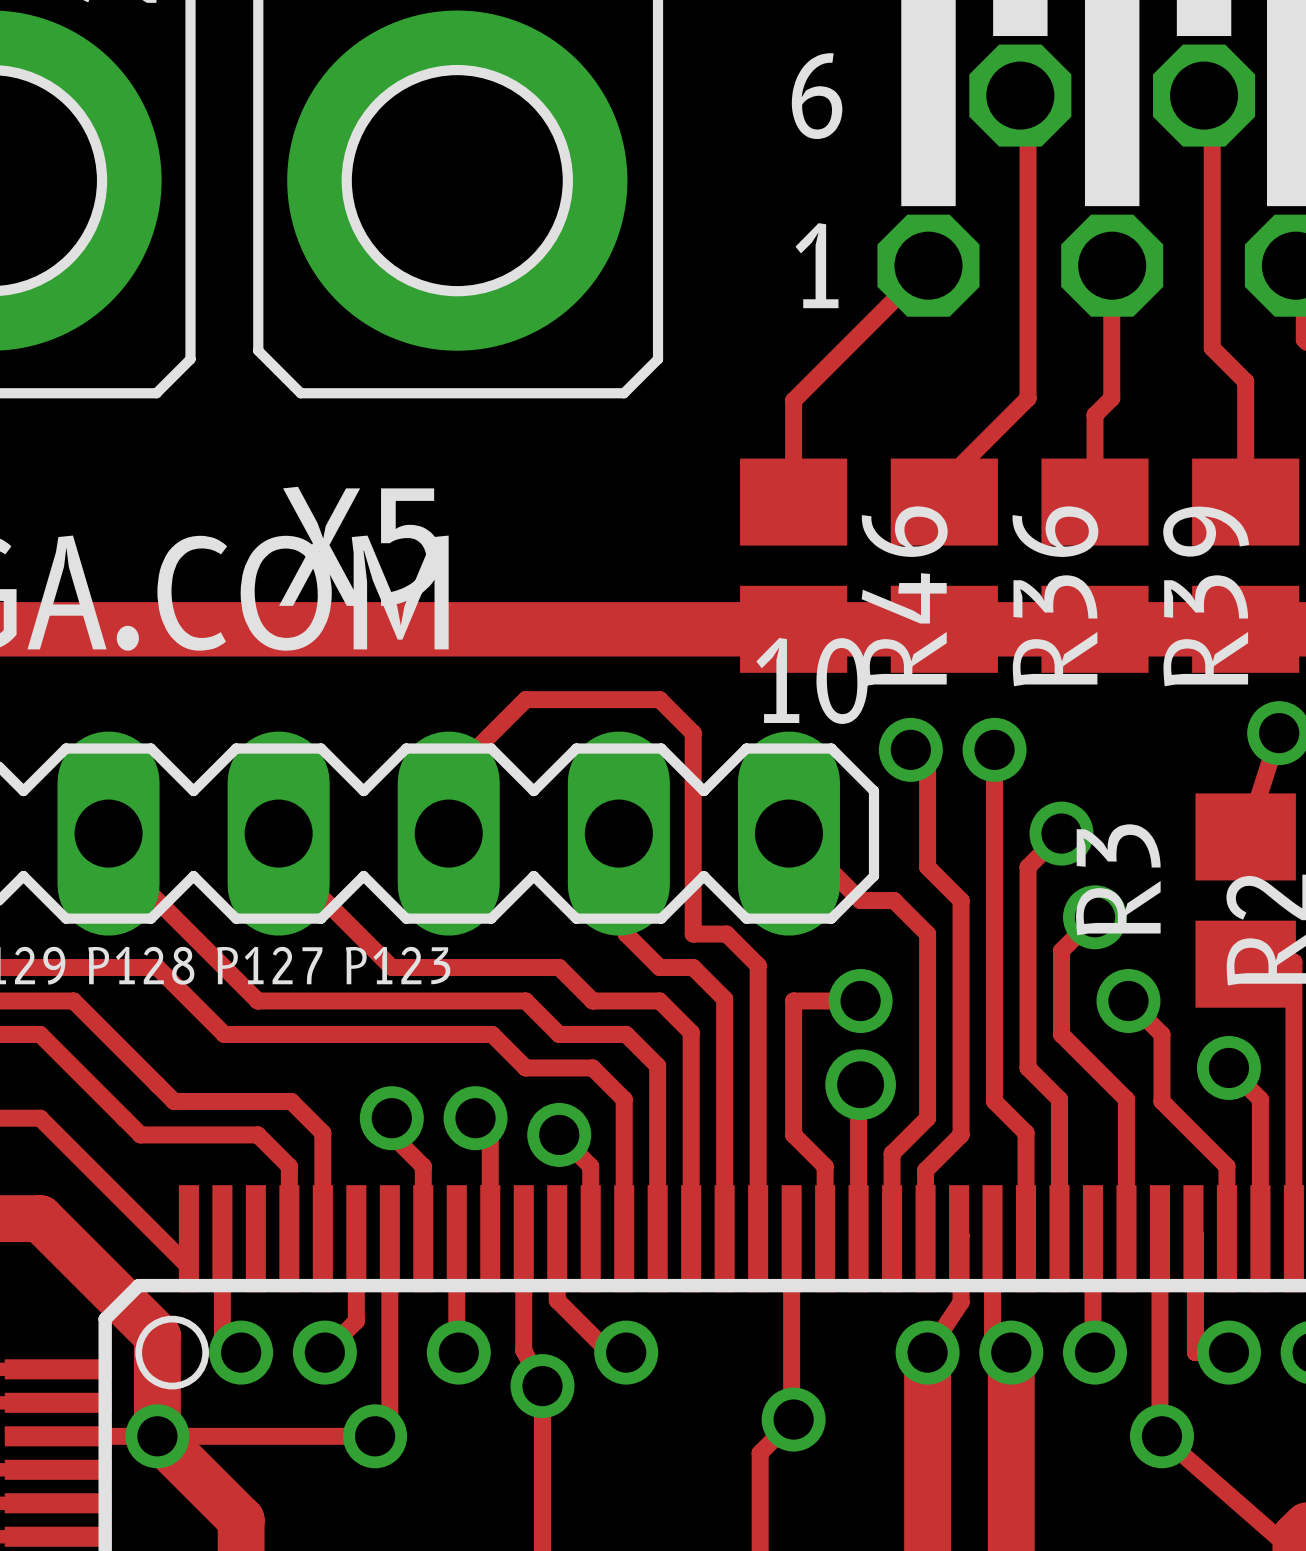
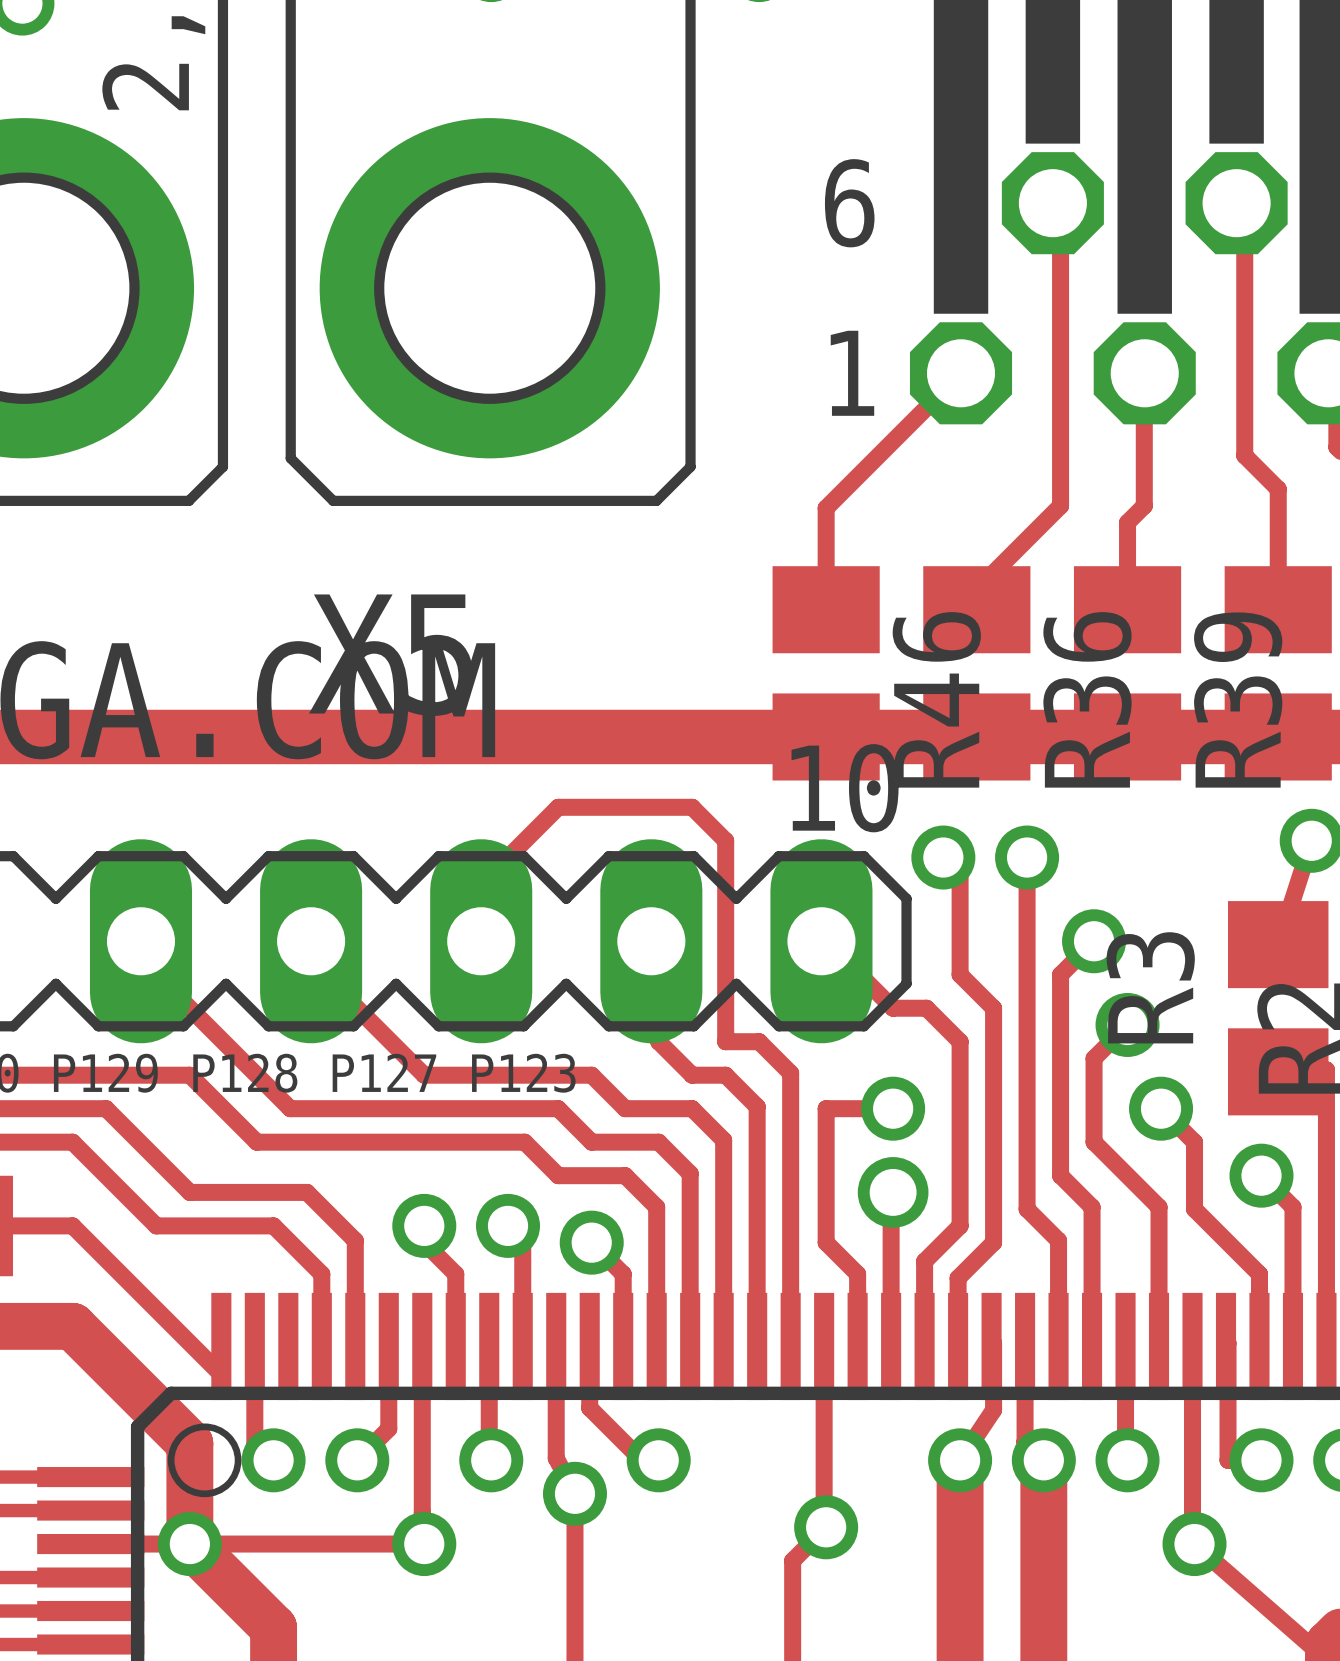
track: (157, 1084) (174, 1101) (291, 1101) -> (189, 1192) (307, 1192) (323, 1209)
track: (123, 1118) (140, 1134) (257, 1134) -> (156, 1225) (273, 1225) (290, 1242)
via position: (375, 1436) -> (424, 1544)

